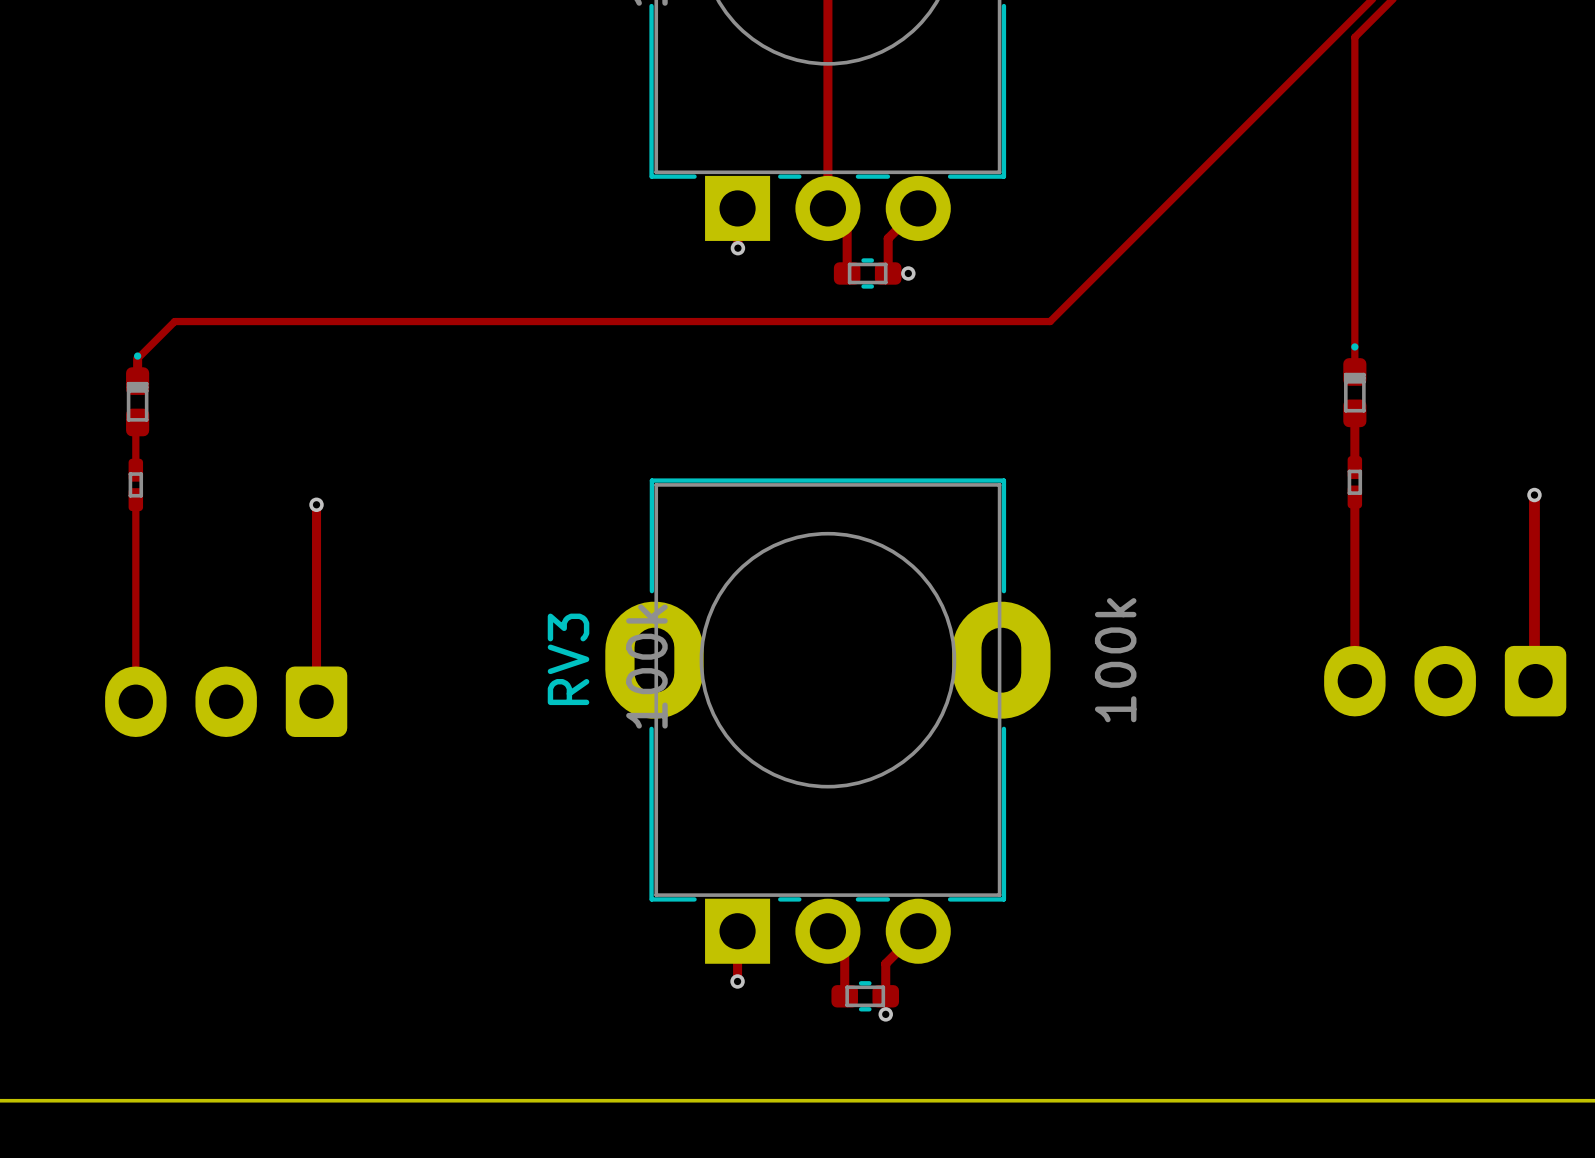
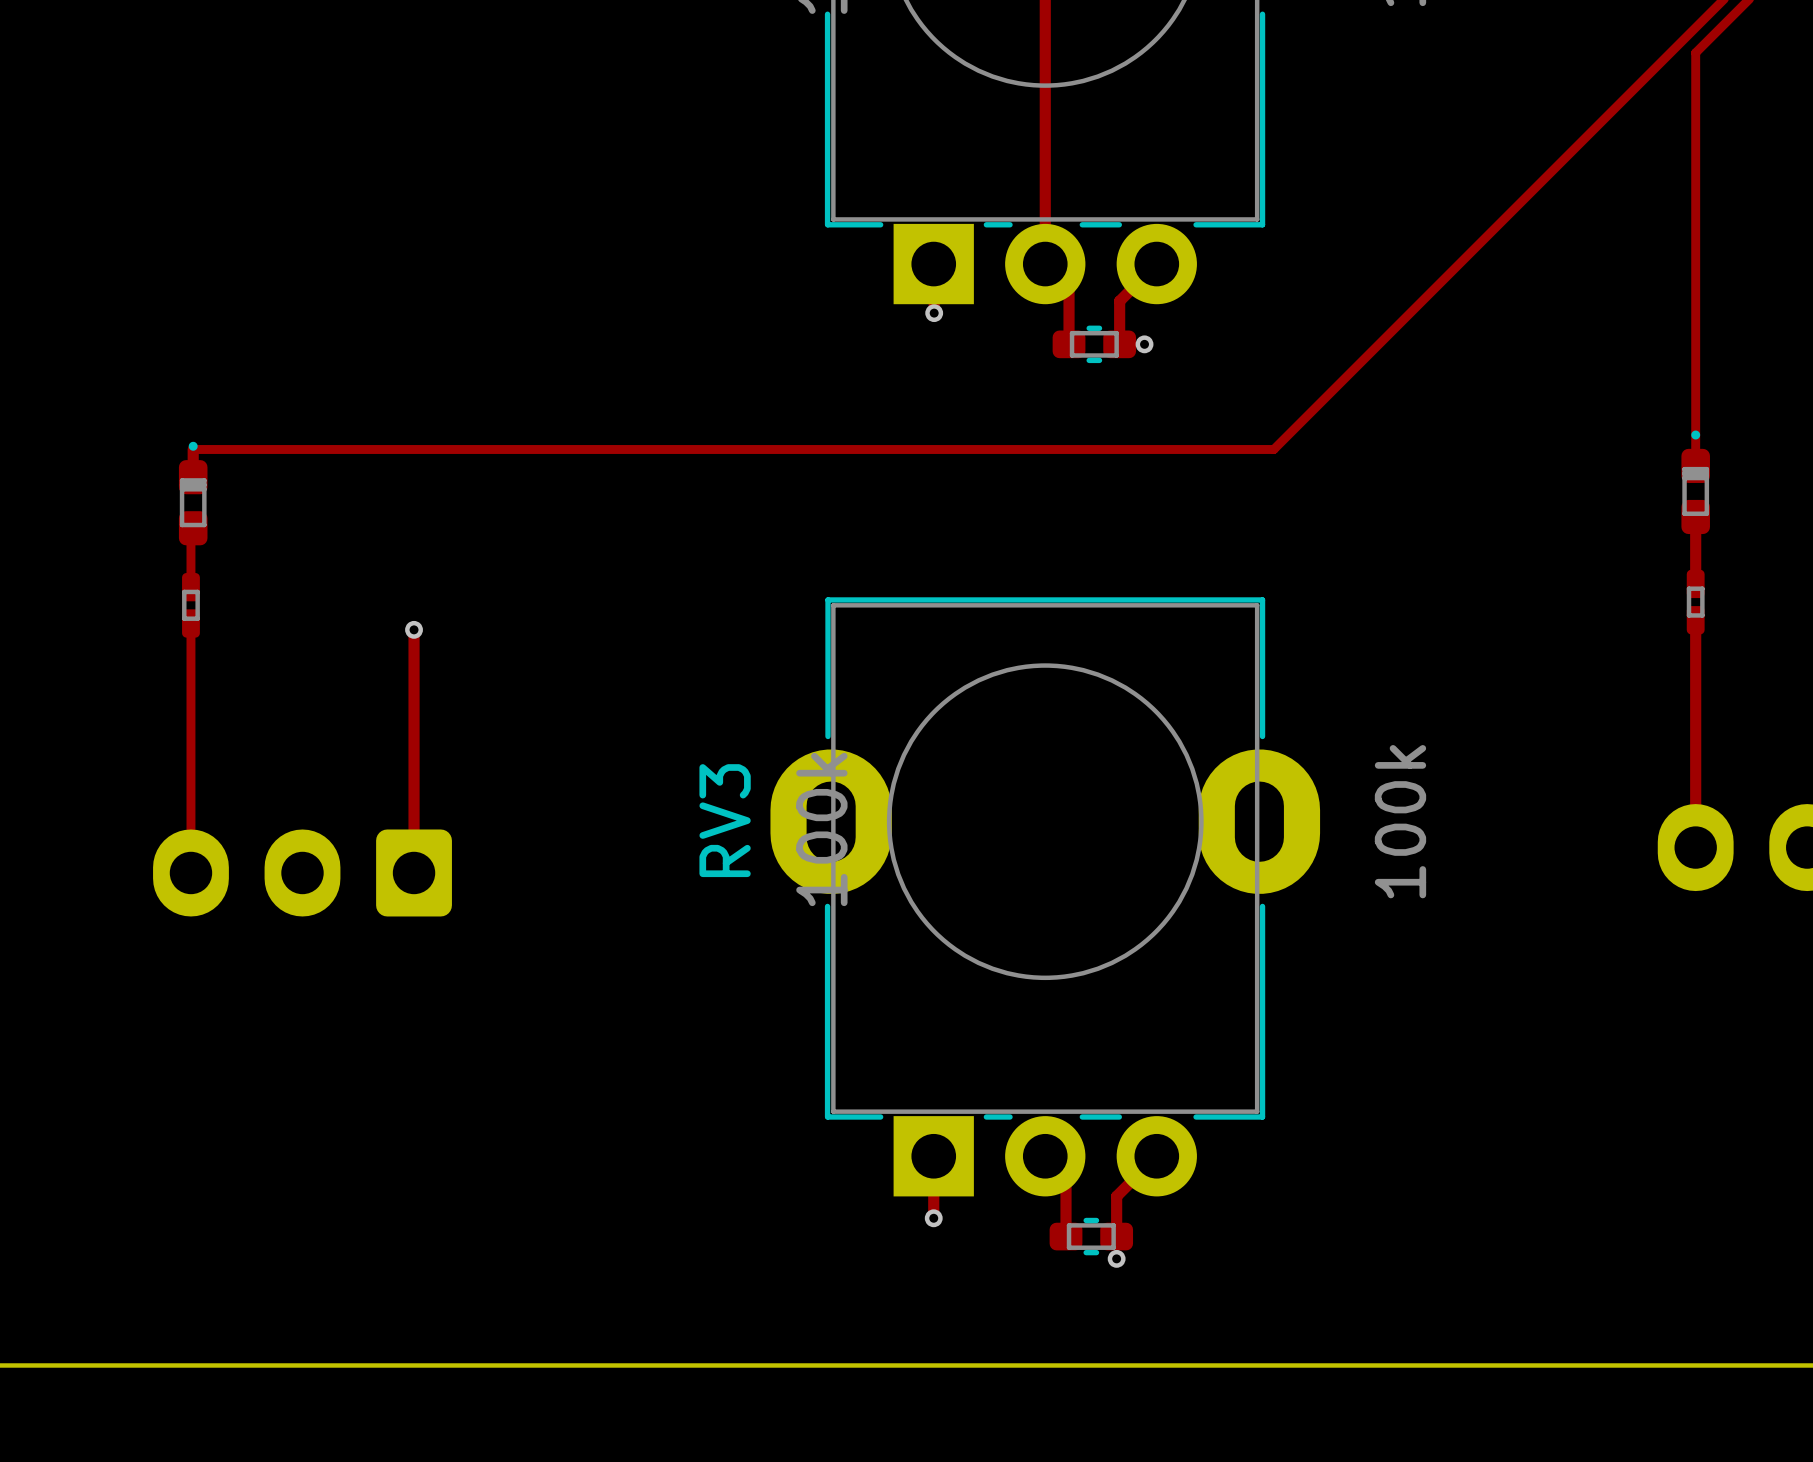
track: (1050, 321) (174, 321) (137, 358) -> (1319, 403) (1273, 449) (193, 449)

